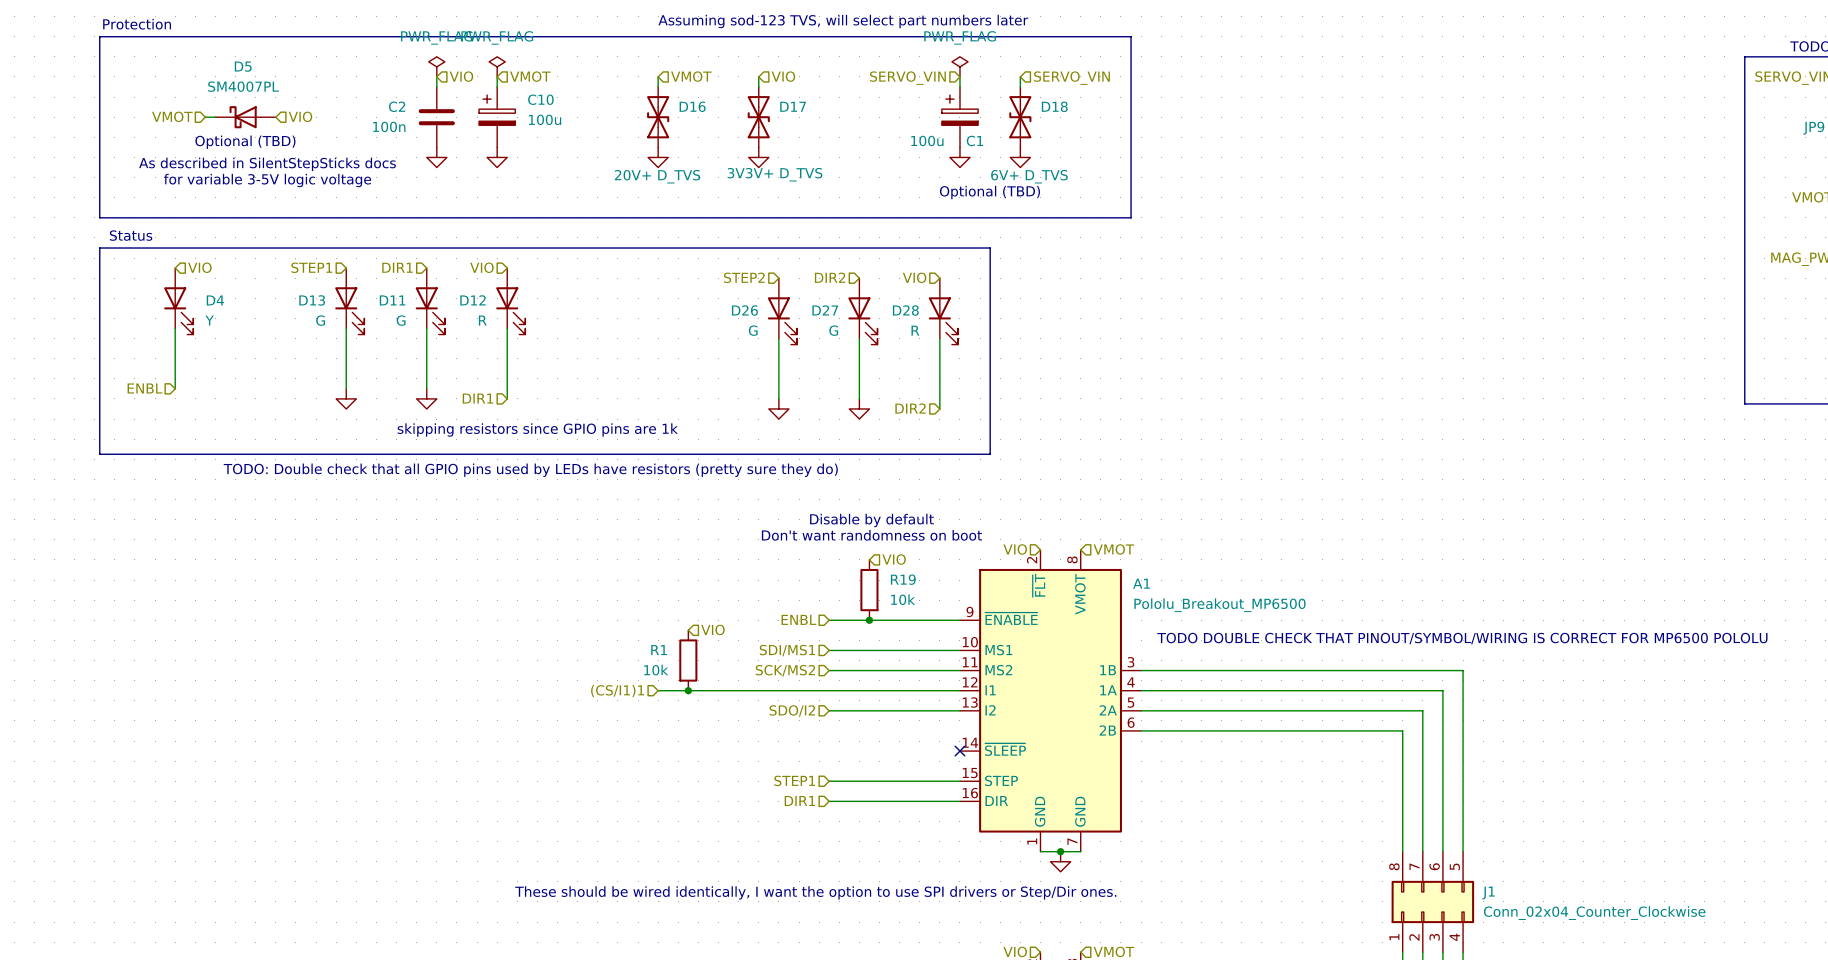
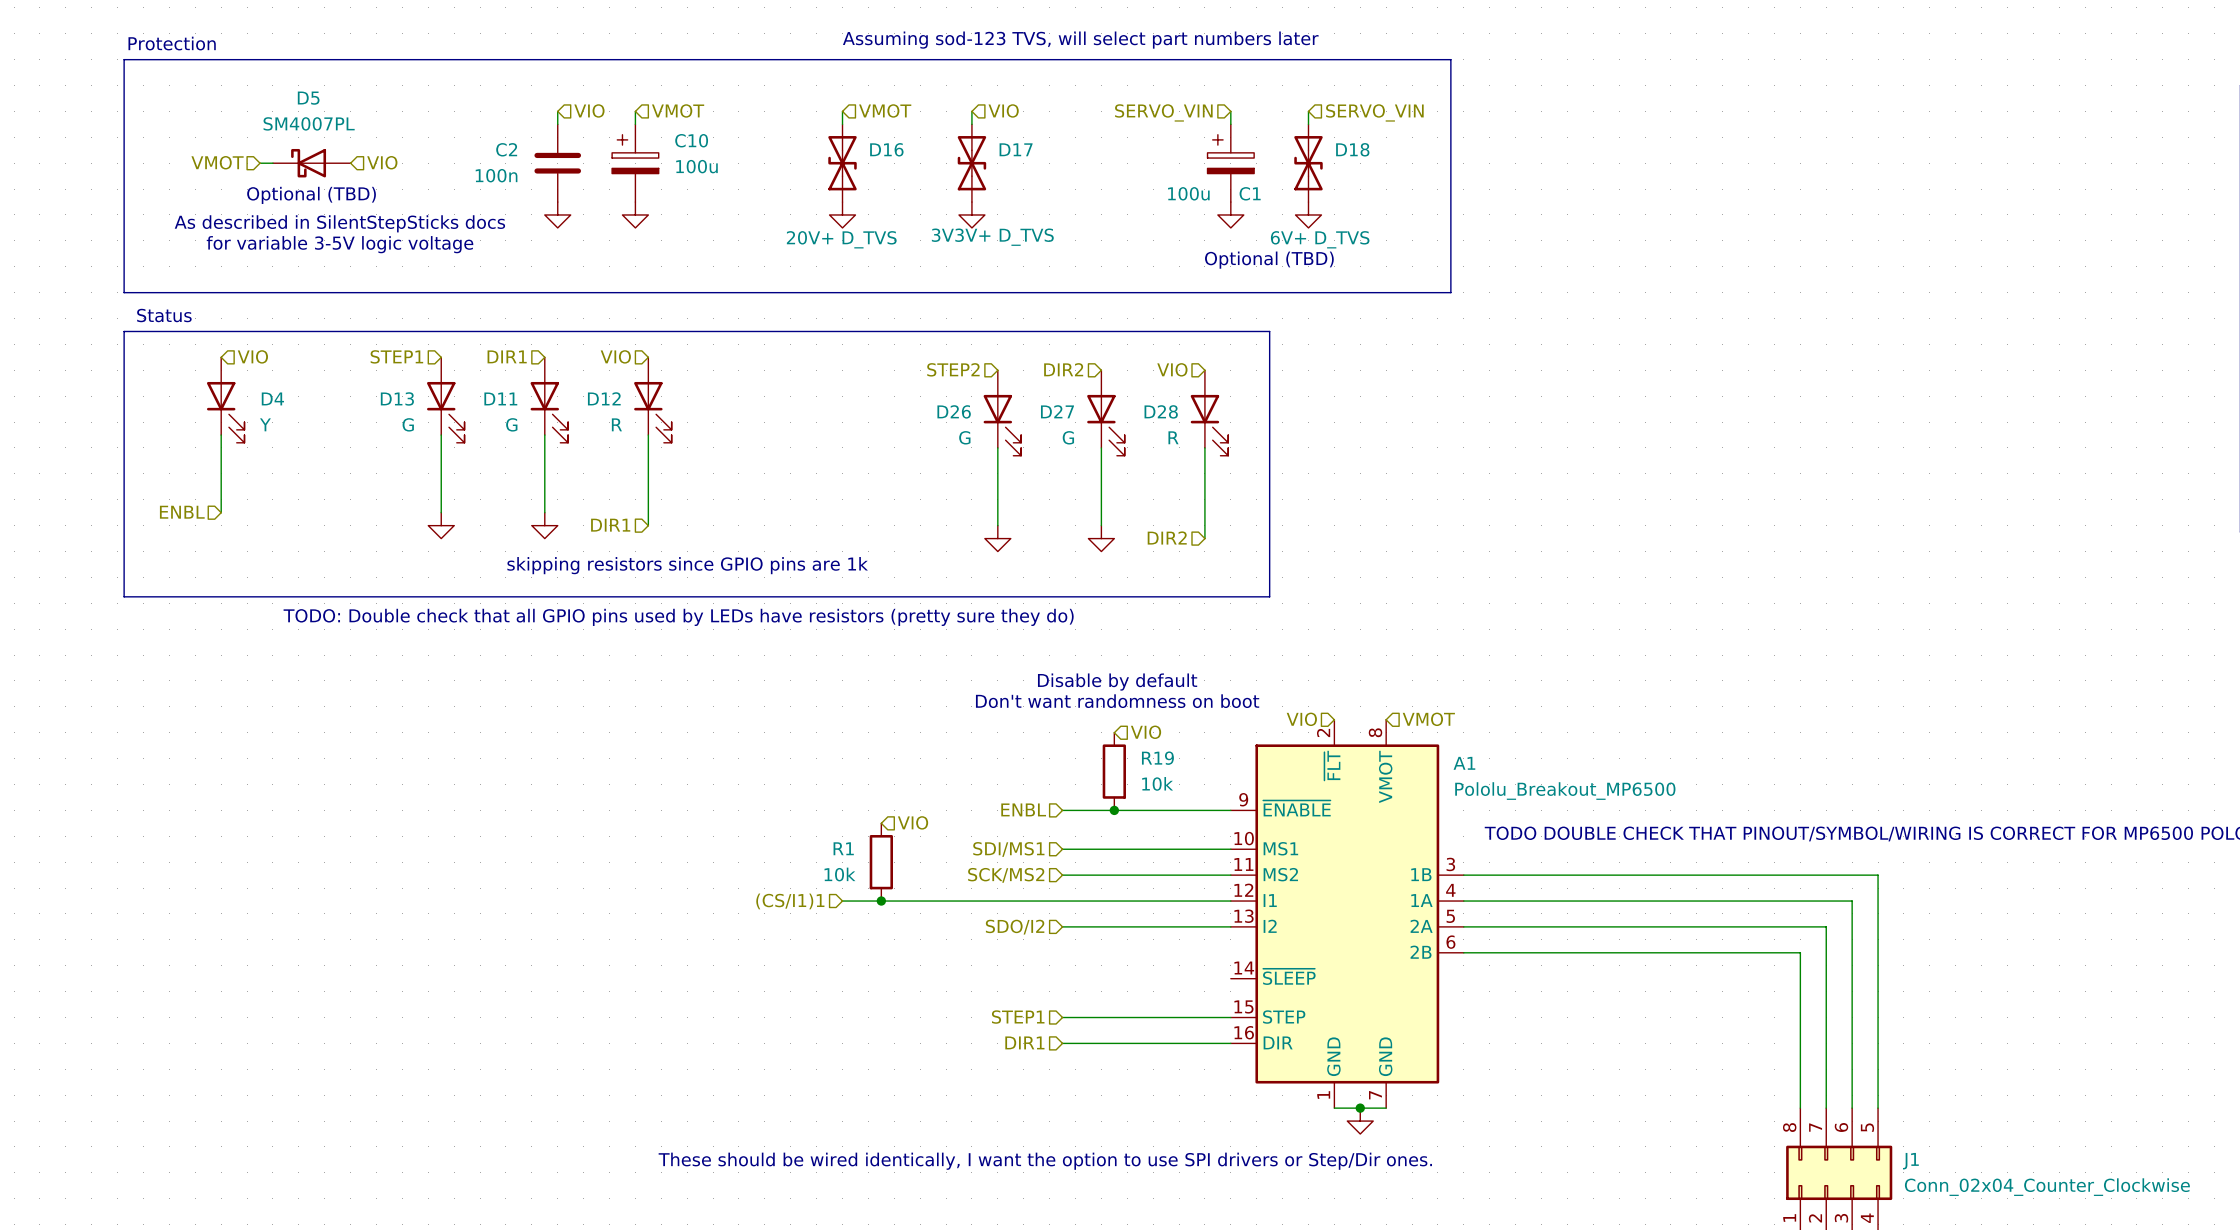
power symbol: PWR_FLAG (436, 66) -> none
power symbol: PWR_FLAG (497, 66) -> none
power symbol: PWR_FLAG (959, 66) -> none
no-connect mark: (959, 751) -> none

